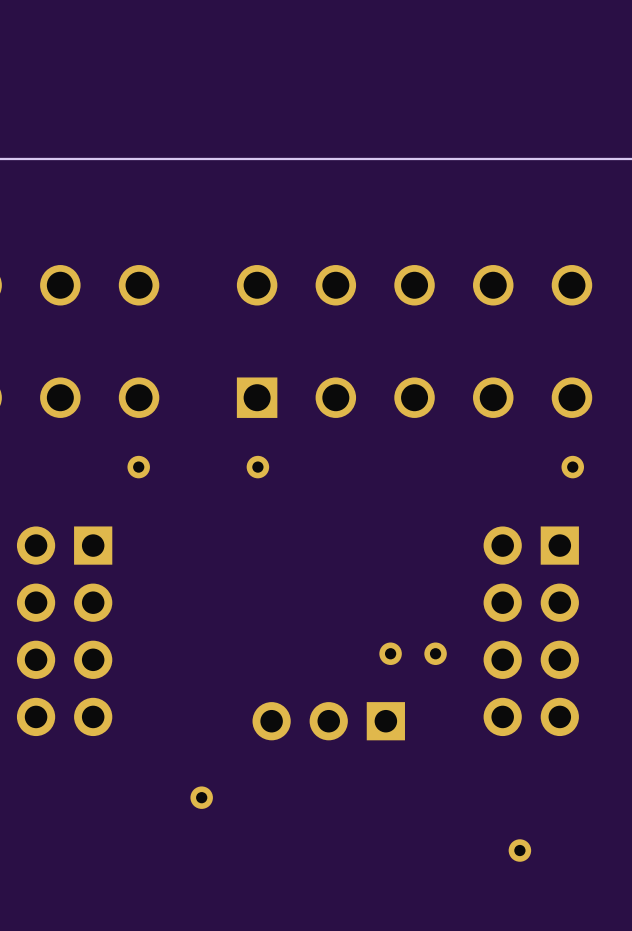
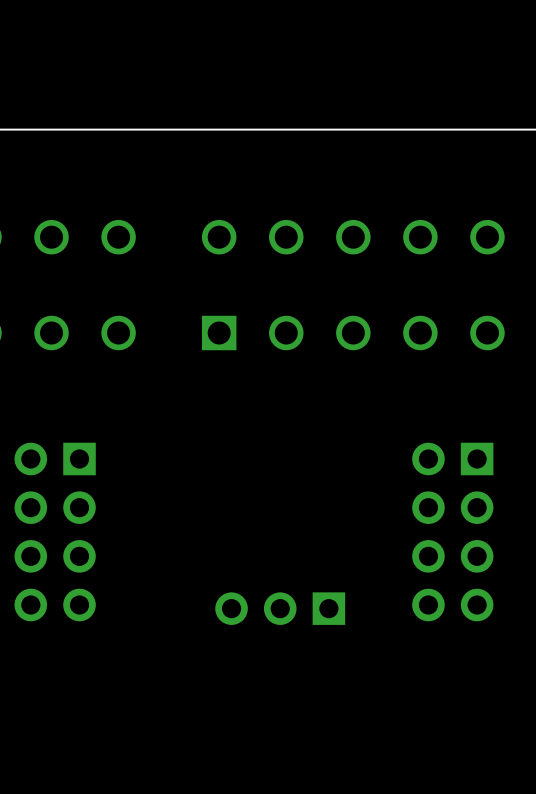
part: (138, 467) -> none
part: (257, 467) -> none
part: (572, 467) -> none
part: (390, 653) -> none
part: (435, 653) -> none
part: (201, 797) -> none
part: (519, 850) -> none

